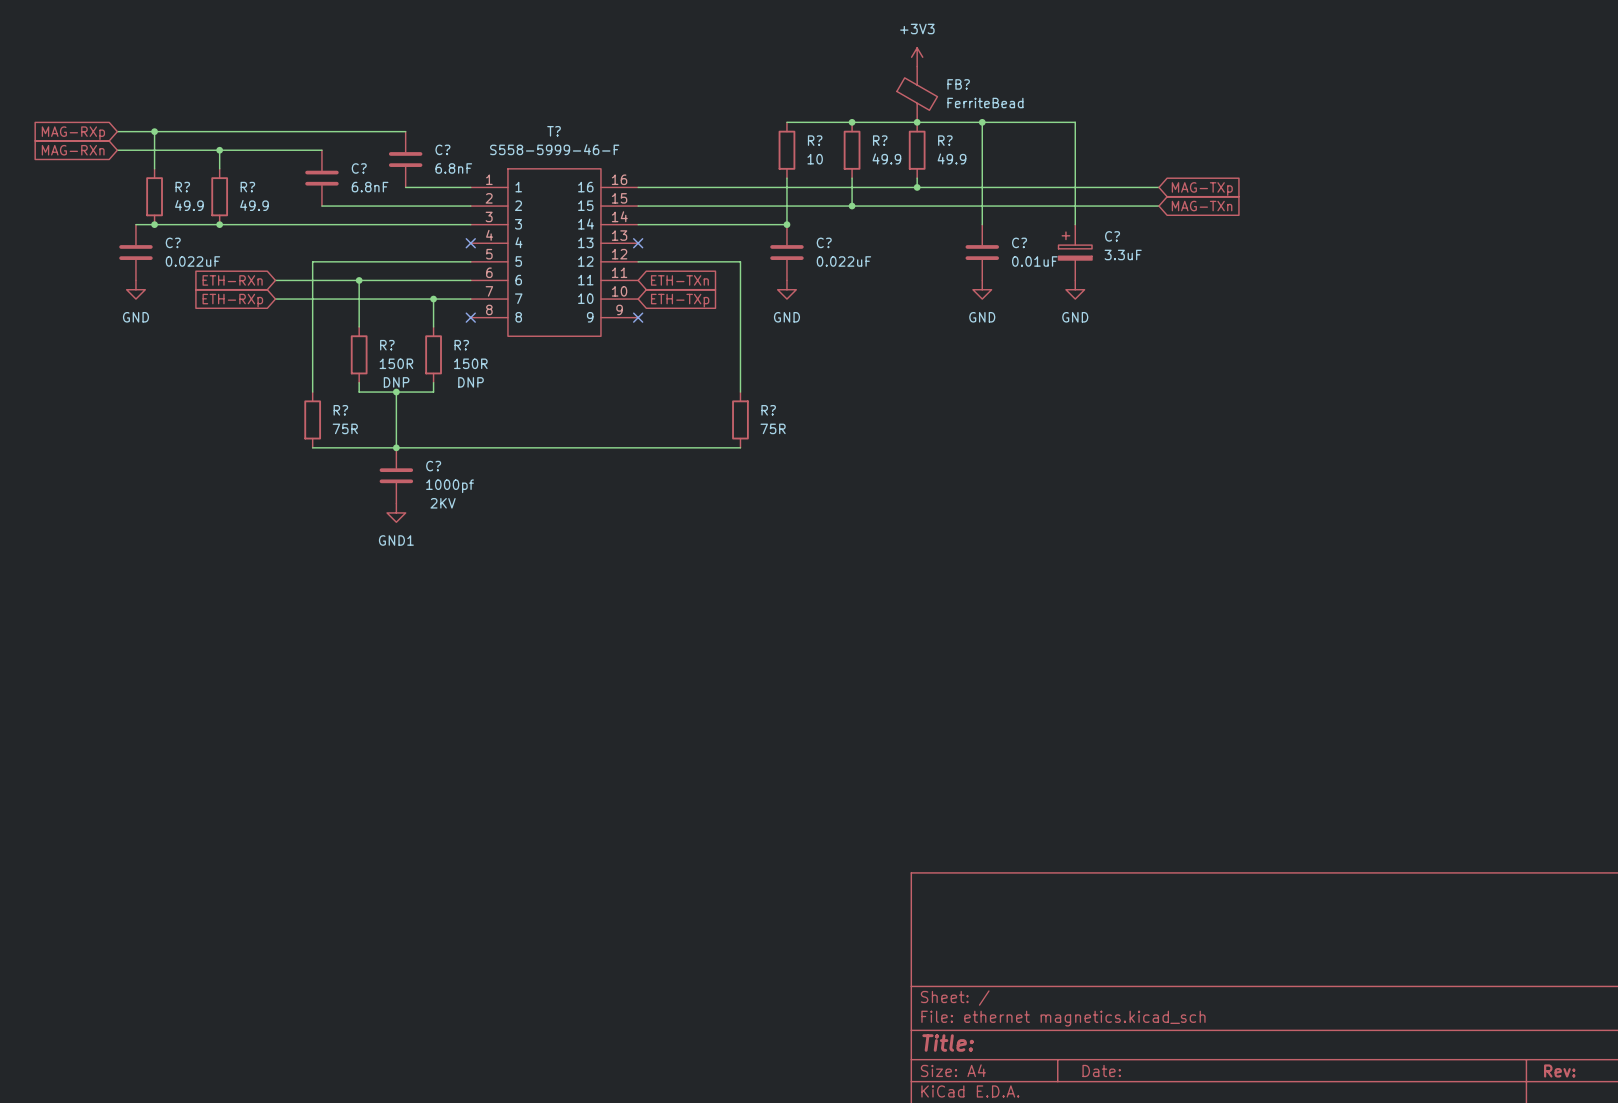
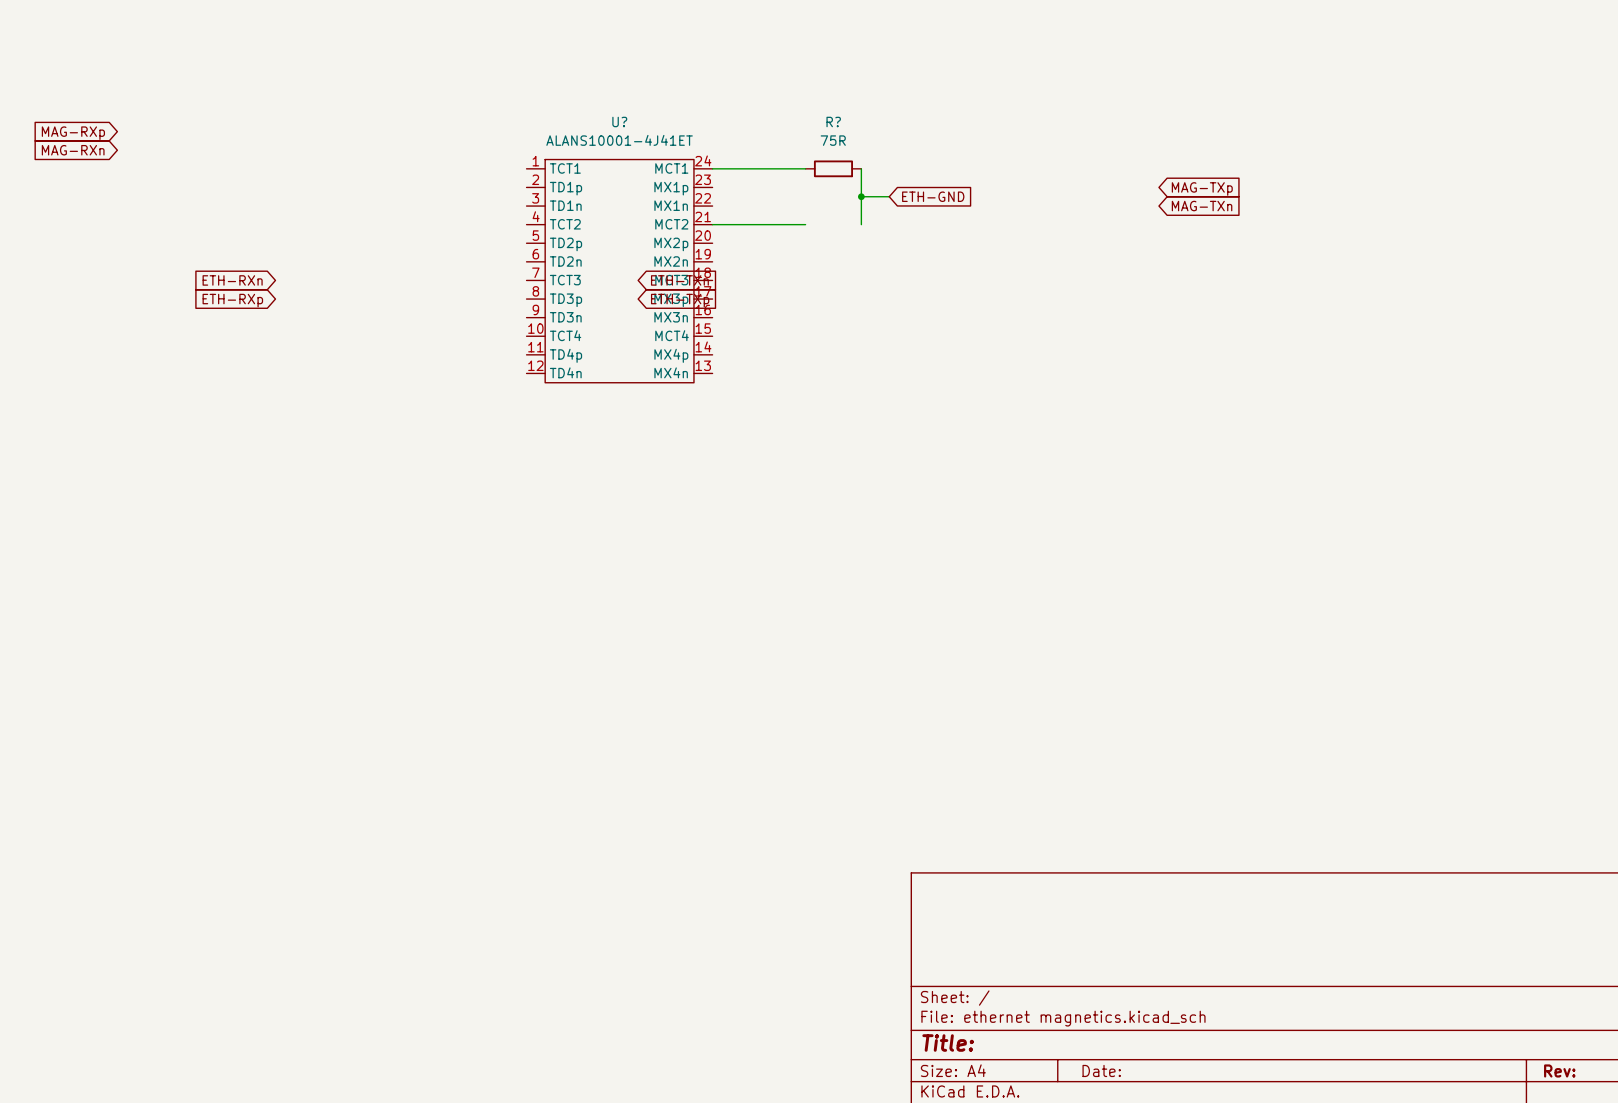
power symbol: +3V3 (917, 57) -> none
FB?: FerriteBead (917, 94) -> none
wire: (786, 122) (1075, 122) (1075, 224) -> none
junction: (852, 122) -> none
junction: (917, 122) -> none
wire: (982, 122) (982, 224) -> none
junction: (982, 122) -> none
wire: (117, 131) (405, 131) -> none
wire: (154, 131) (154, 168) -> none
junction: (154, 131) -> none
wire: (117, 150) (321, 150) -> none
wire: (219, 150) (219, 168) -> none
junction: (219, 150) -> none
R?: 10 (786, 150) -> none
R?: 49.9 (852, 150) -> none
R?: 49.9 (917, 150) -> none
C?: 6.8nF (405, 159) -> none
wire: none -> (712, 168) (805, 168)
R?: none -> 75R (833, 168)
wire: none -> (861, 168) (861, 224)
C?: 6.8nF (321, 178) -> none
wire: (786, 178) (786, 224) -> (805, 224) (786, 224)
wire: (852, 178) (852, 206) -> none
wire: (917, 178) (917, 187) -> none
wire: (405, 187) (470, 187) -> none
wire: (638, 187) (1158, 187) -> none
junction: (917, 187) -> none
R?: 49.9 (154, 196) -> none
R?: 49.9 (219, 196) -> none
wire: none -> (861, 196) (889, 196)
global label: none -> ETH-GND (933, 196)
wire: (321, 206) (470, 206) -> none
wire: (638, 206) (1158, 206) -> none
junction position: (852, 206) -> (861, 196)
wire: (135, 224) (470, 224) -> none
junction: (154, 224) -> none
junction: (219, 224) -> none
wire: (638, 224) (712, 224) -> none
junction: (786, 224) -> none
no-connect mark: (470, 243) -> none
no-connect mark: (638, 243) -> none
C?: 0.022uF (135, 252) -> none
T?: S558-5999-46-F (554, 252) -> none
C?: 0.022uF (786, 252) -> none
C?: 0.01uF (982, 252) -> none
C?: 3.3uF (1075, 252) -> none
wire: (470, 261) (312, 261) (312, 392) -> none
wire: (638, 261) (740, 261) (740, 392) -> none
U?: none -> ALANS10001-4J41ET (619, 271)
wire: (275, 280) (470, 280) -> none
wire: (359, 280) (359, 326) -> none
junction: (359, 280) -> none
power symbol: GND (135, 289) -> none
power symbol: GND (786, 289) -> none
power symbol: GND (982, 289) -> none
power symbol: GND (1075, 289) -> none
wire: (275, 299) (470, 299) -> none
wire: (433, 299) (433, 326) -> none
junction: (433, 299) -> none
no-connect mark: (470, 317) -> none
no-connect mark: (638, 317) -> none
R?: 150R (359, 354) -> none
R?: 150R (433, 354) -> none
wire: (359, 382) (359, 392) (433, 392) (433, 382) -> none
wire: (396, 392) (396, 447) -> none
junction: (396, 392) -> none
R?: 75R (312, 419) -> none
R?: 75R (740, 419) -> none
wire: (312, 447) (740, 447) -> none
junction: (396, 447) -> none
C?: 1000pf (396, 475) -> none
power symbol: GND1 (396, 512) -> none

